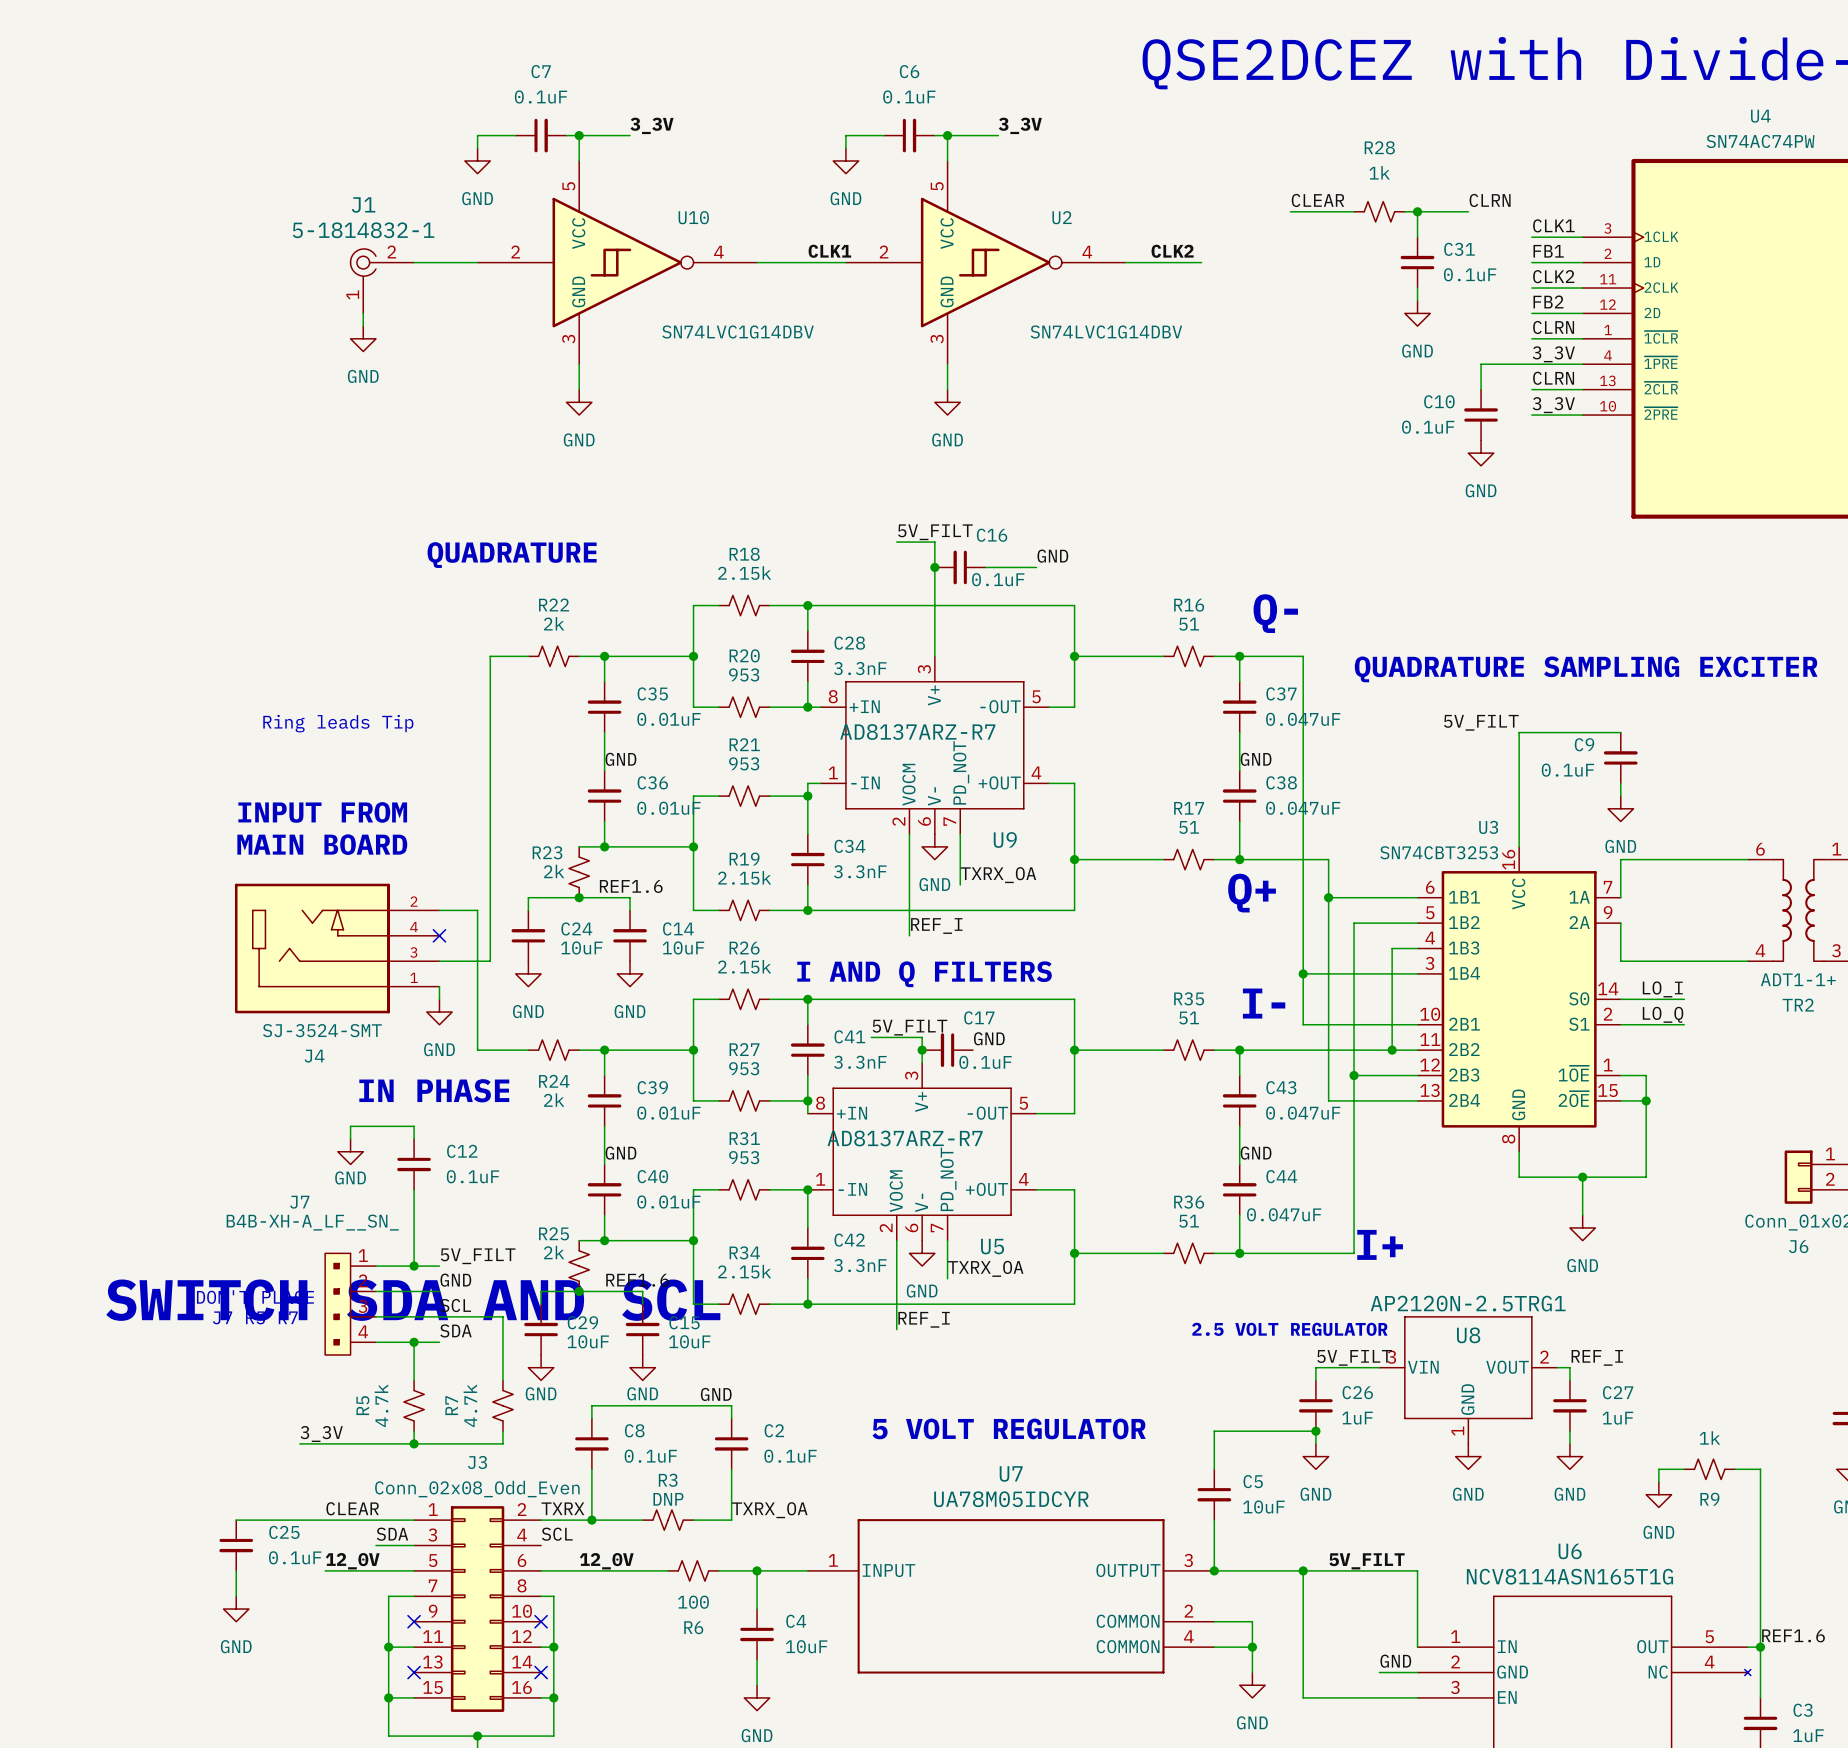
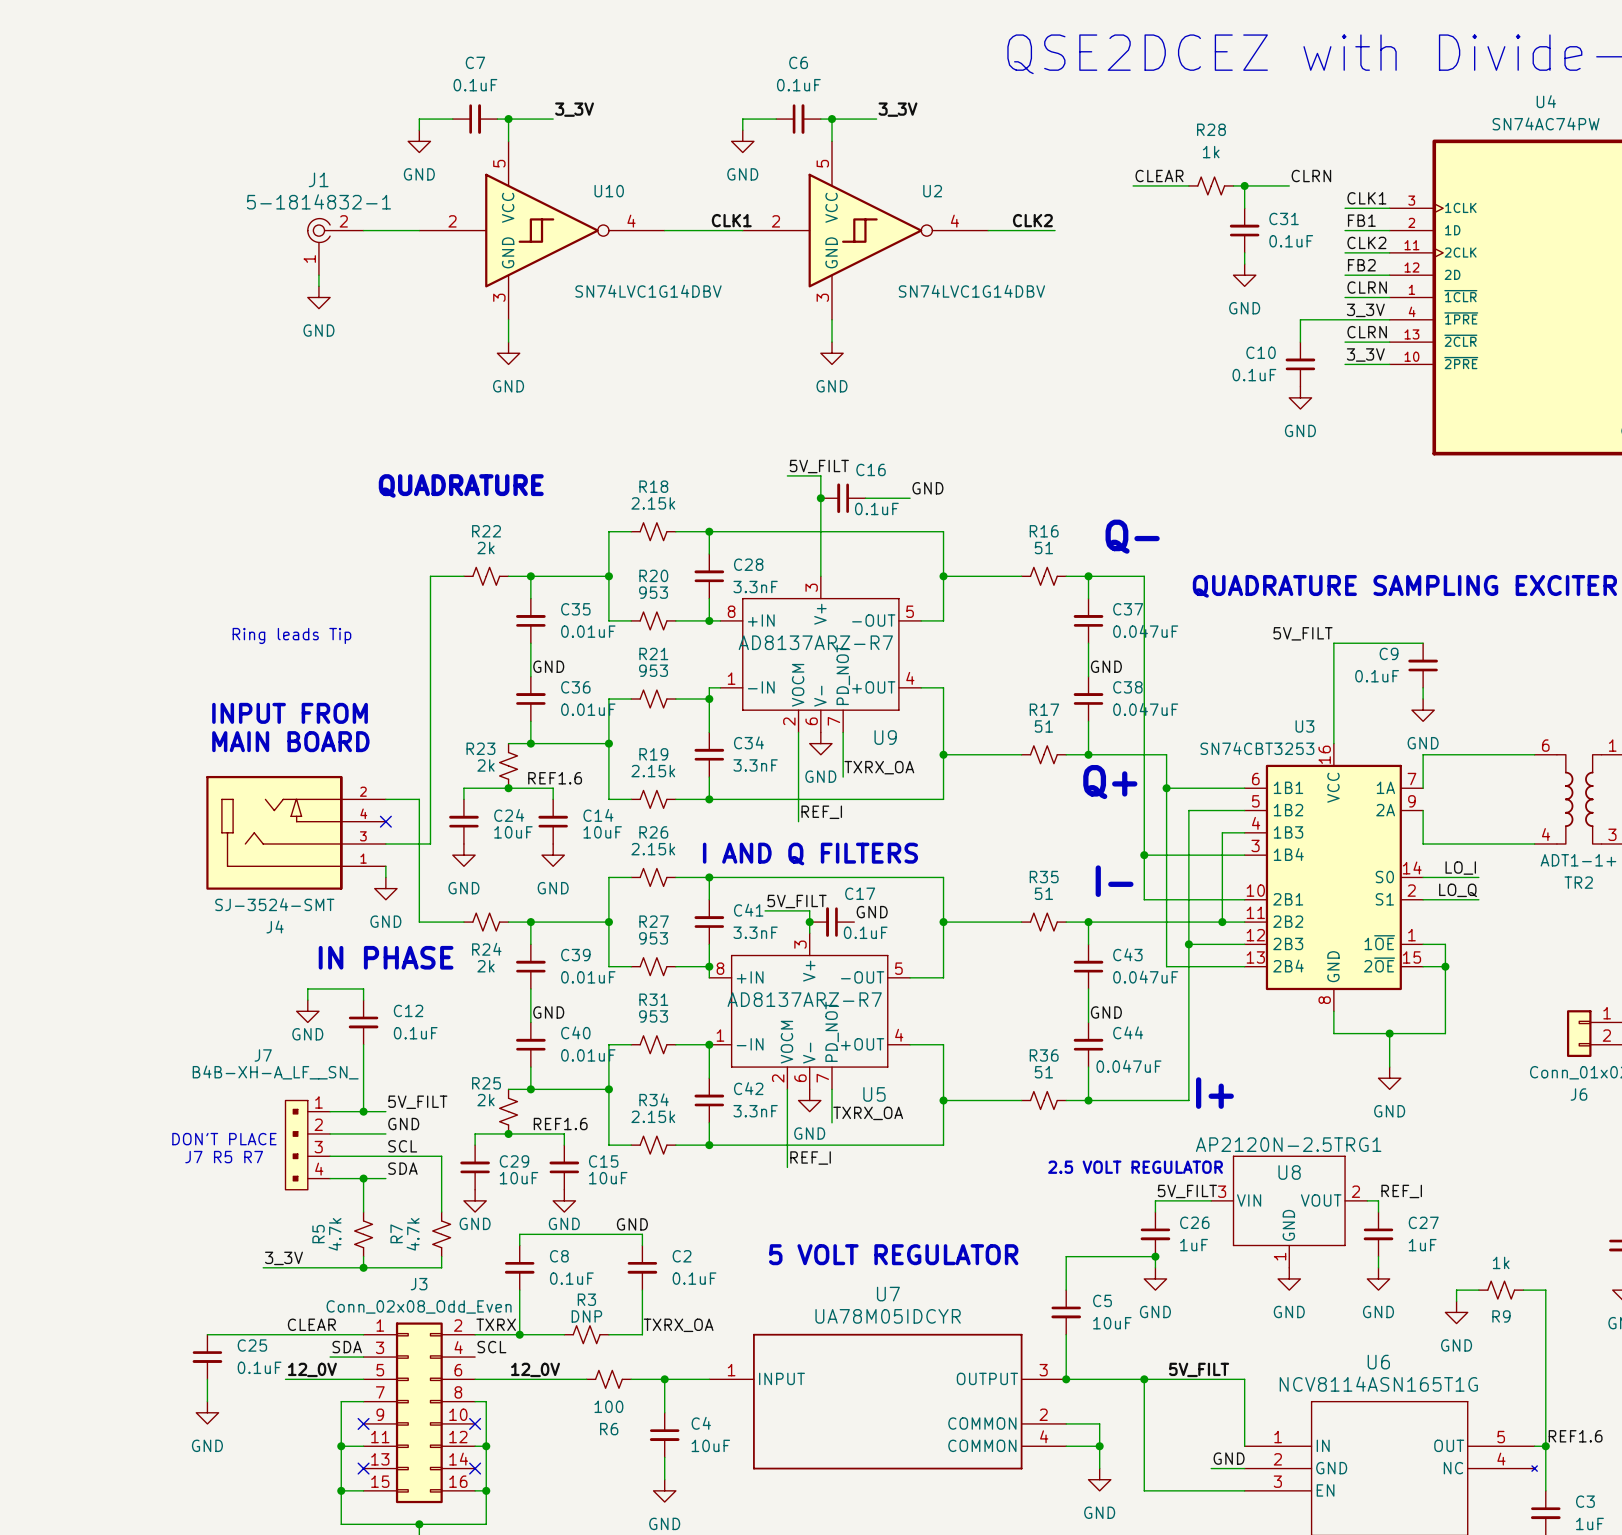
text: SWITCH SDA AND SCL (413, 1300) -> none

